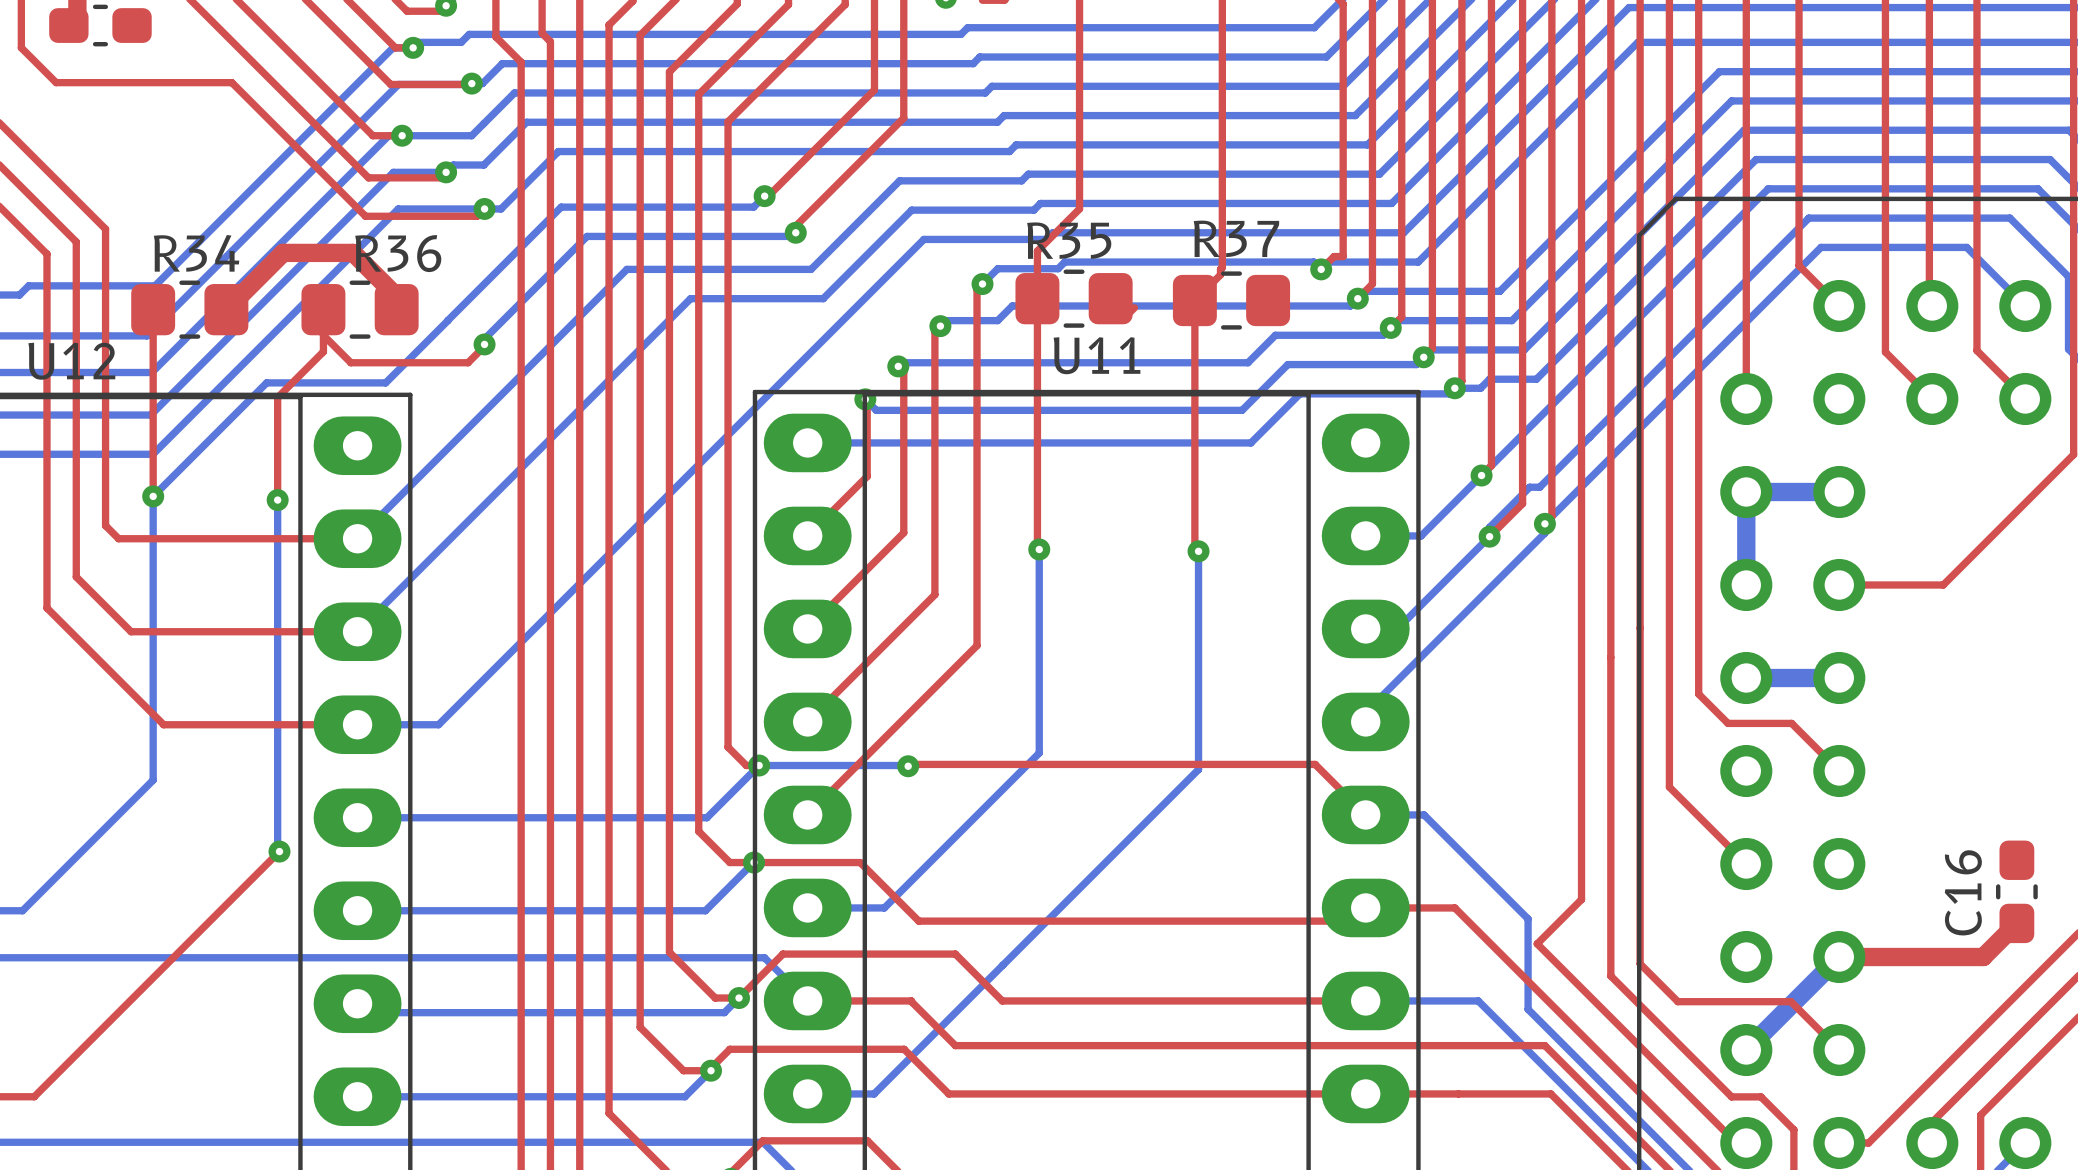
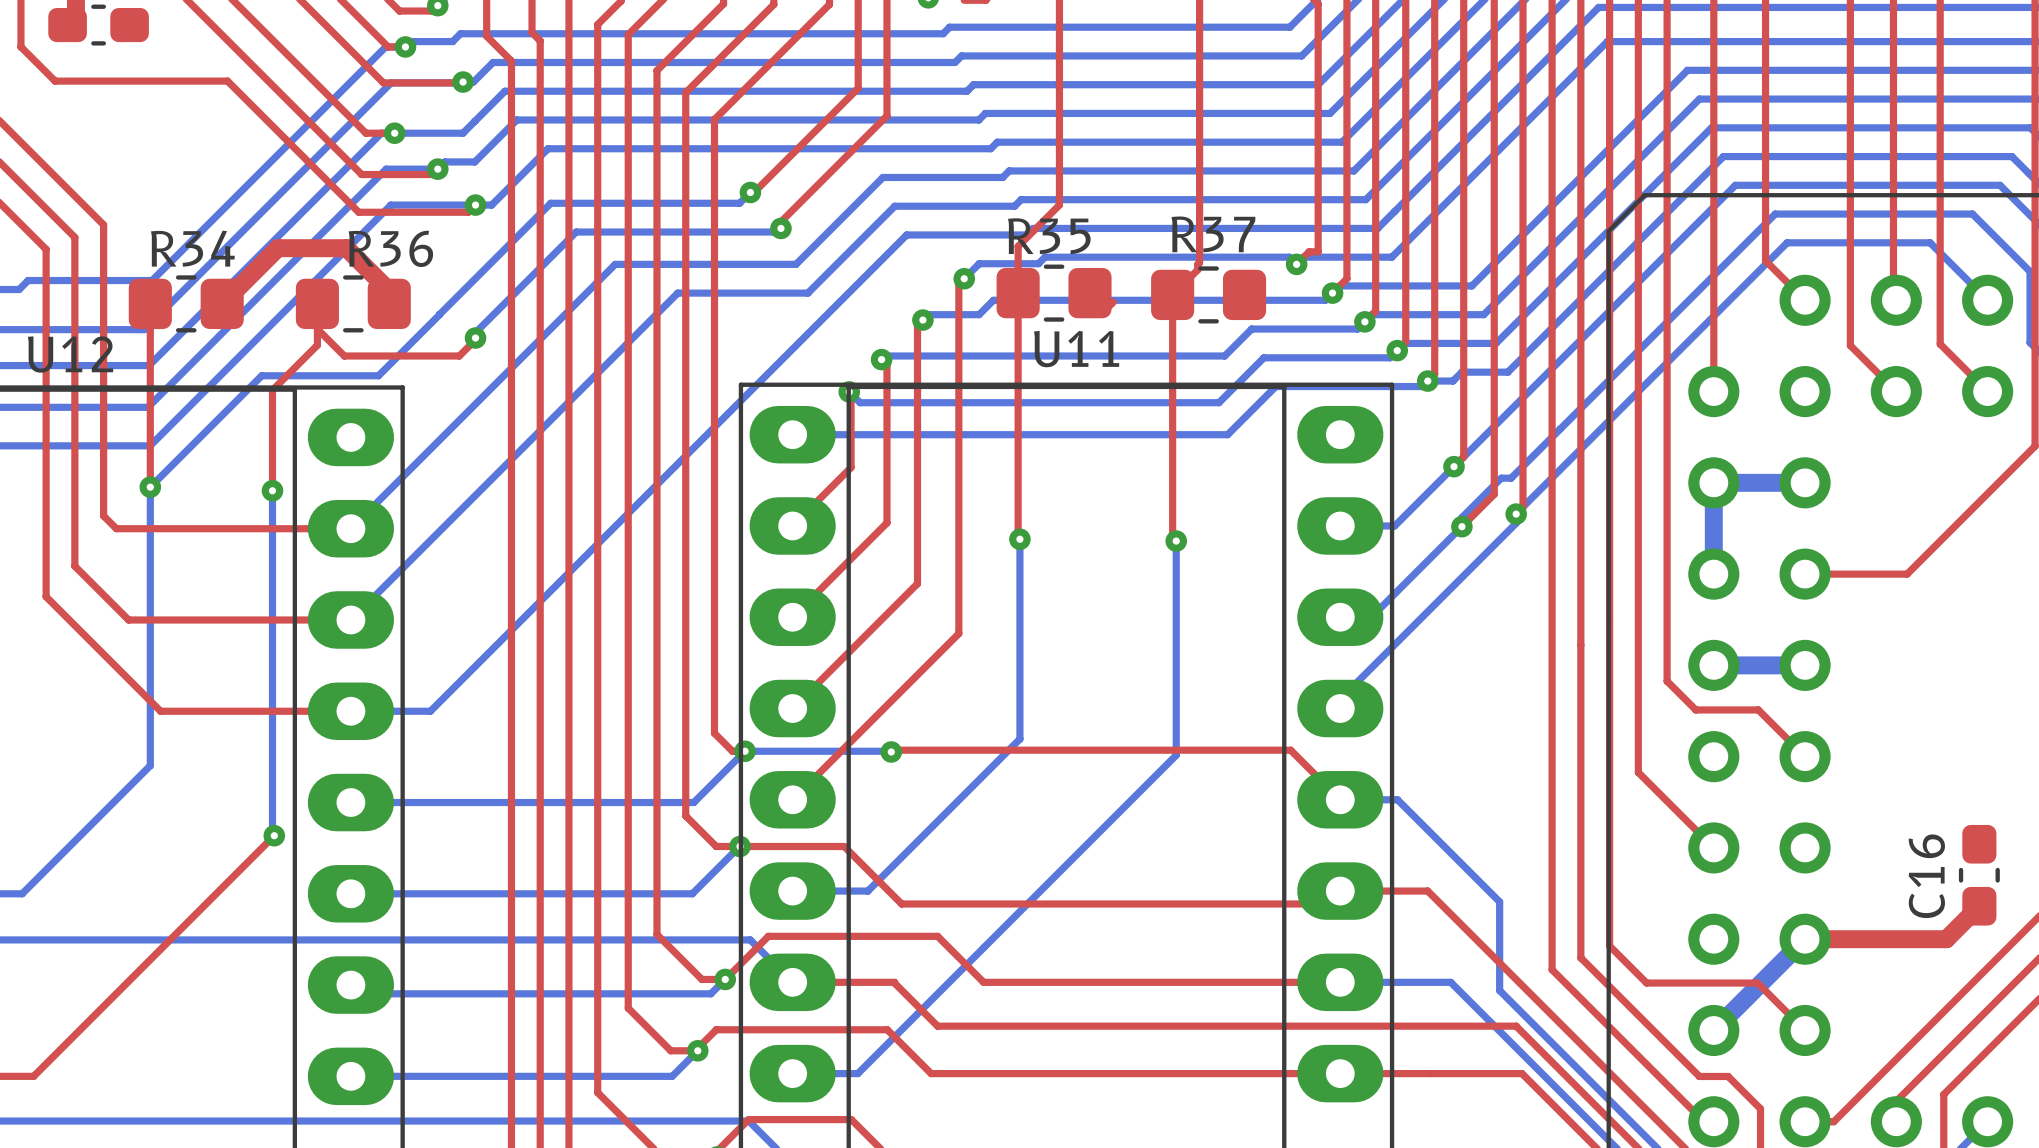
top track: (1581, 899) (1537, 943) (1581, 988) -> (1552, 882) (1552, 969)

